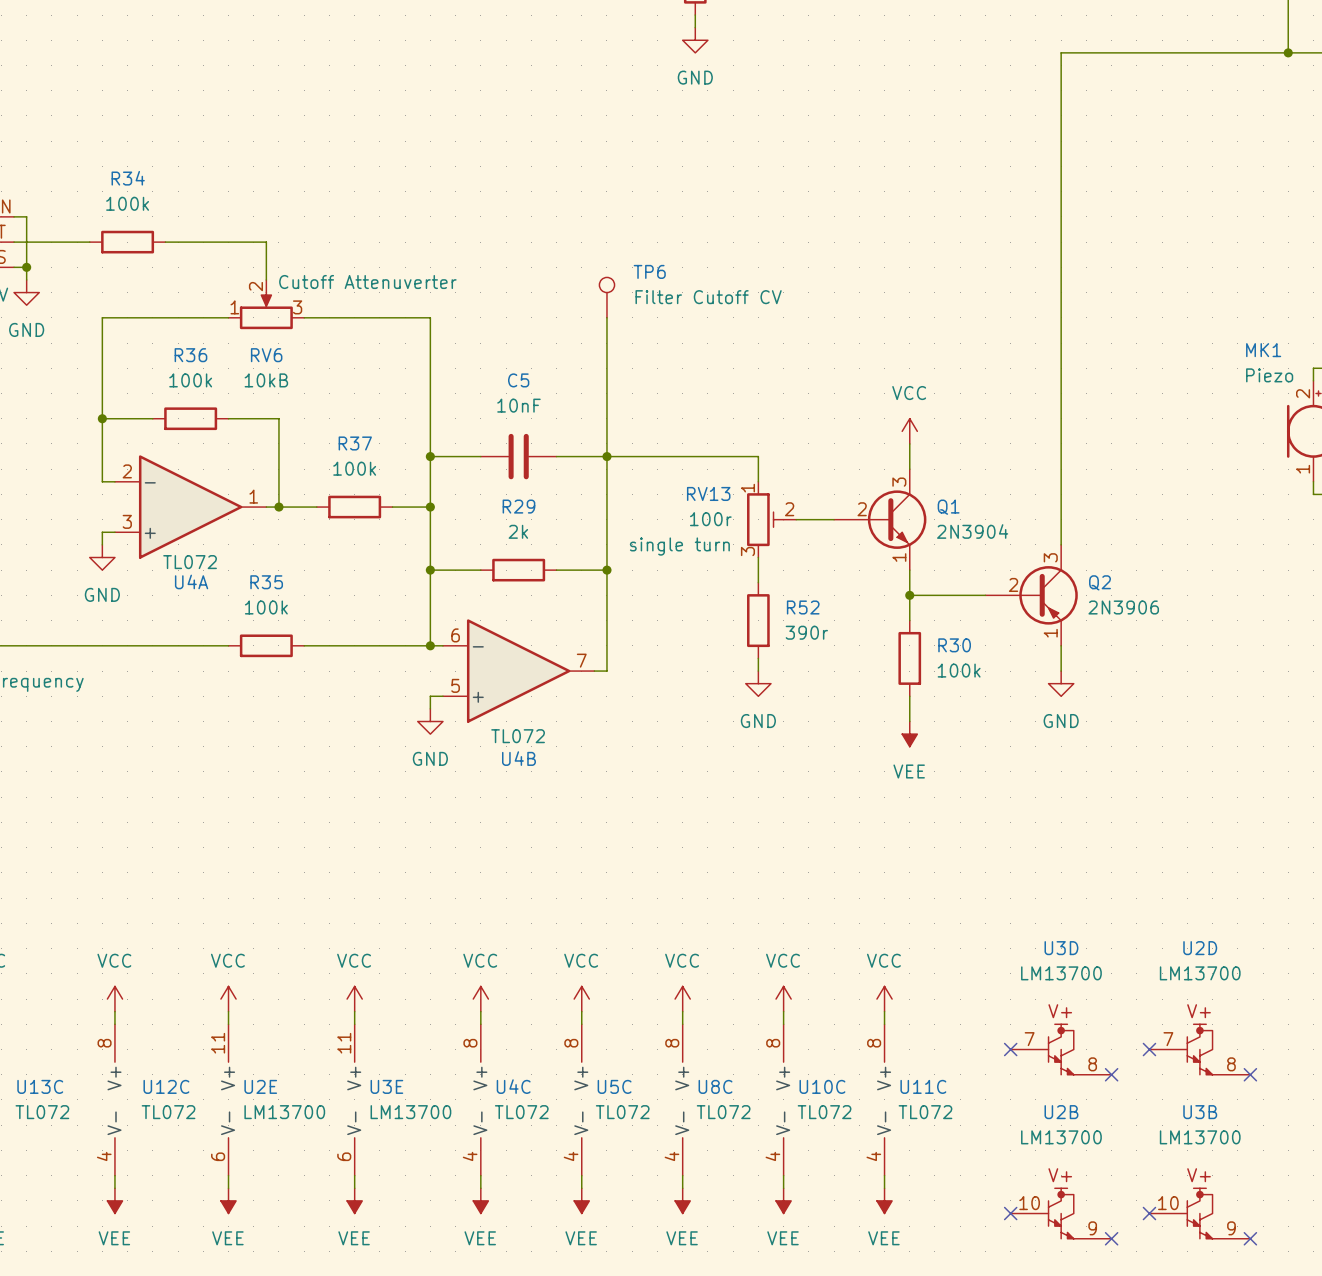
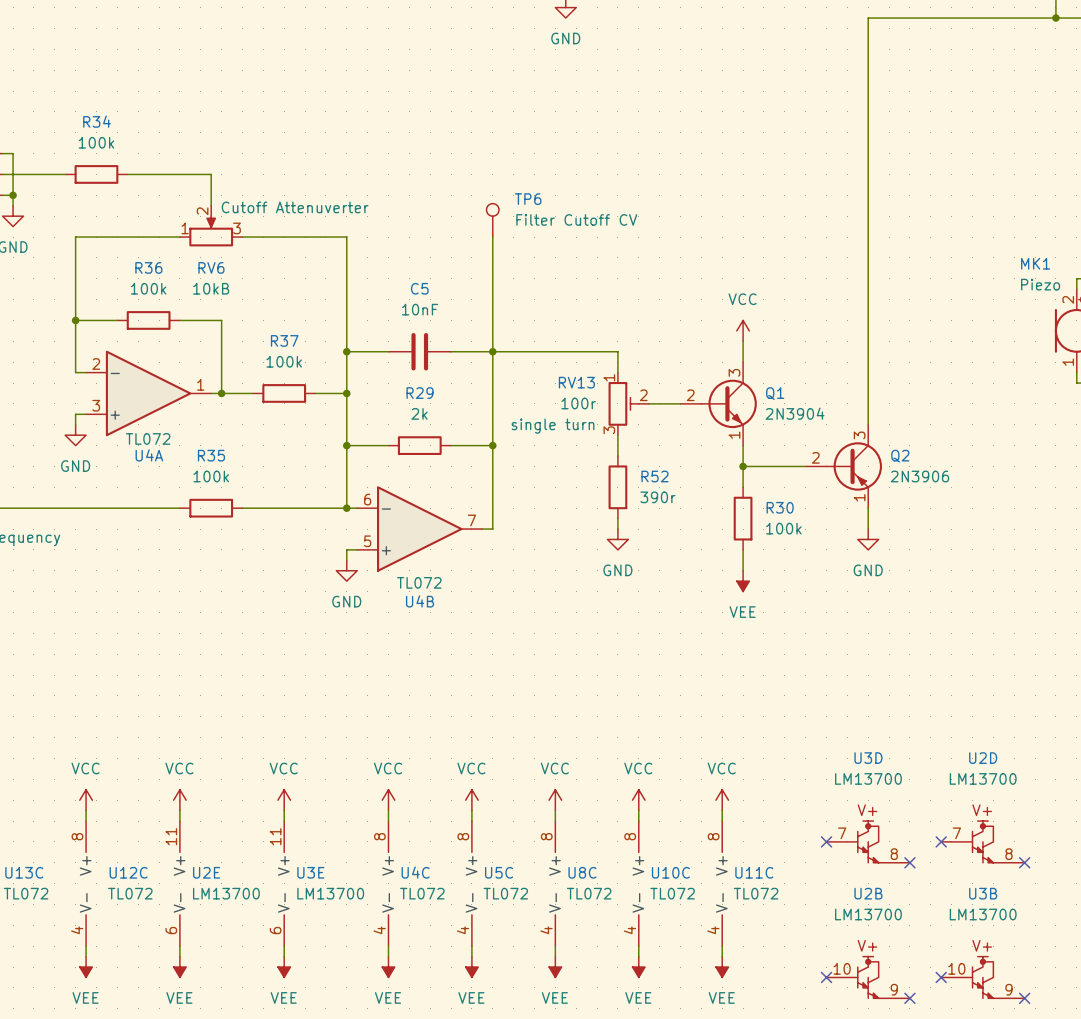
Q1 symbol: [834, 469, 927, 571] -> [680, 362, 757, 446]
Q2 symbol: [985, 544, 1078, 646] -> [805, 424, 882, 509]

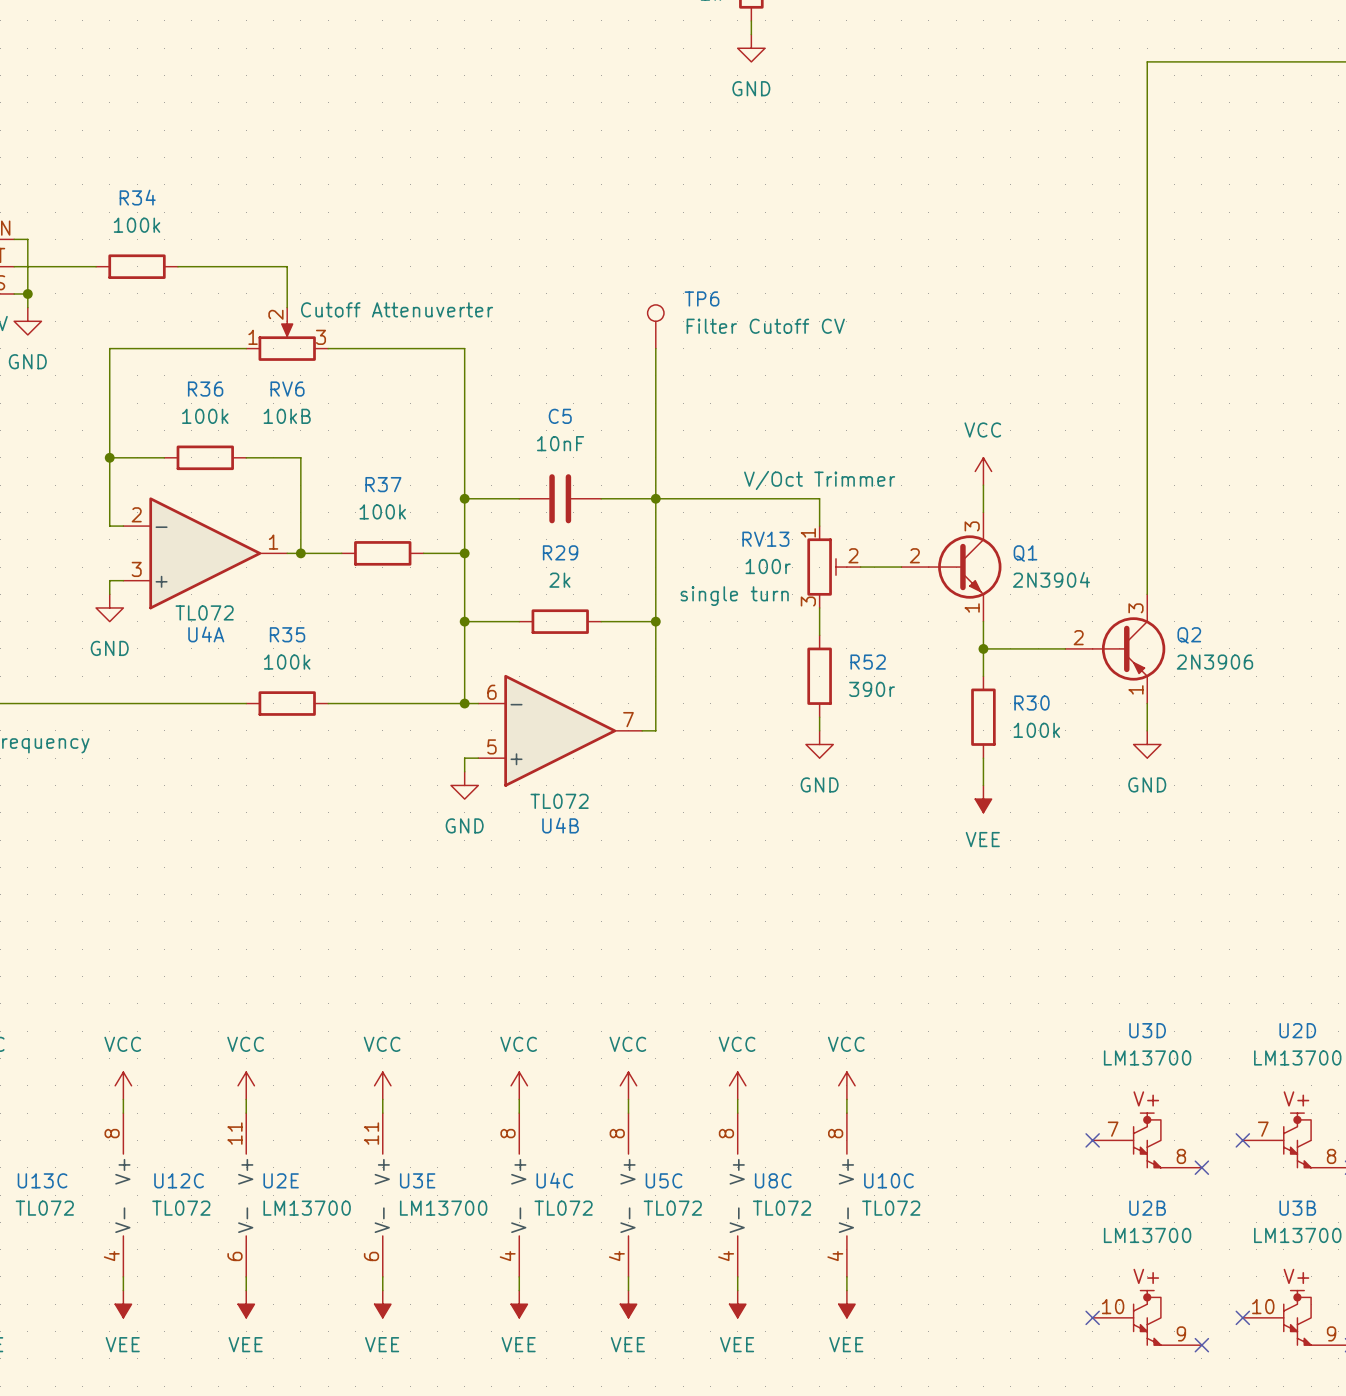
RV13 text: none -> V/Oct Trimmer (819, 480)
power symbol: VCC (722, 800) -> none
wire: (722, 810) (722, 821) -> none
U11C: TL072 (722, 883) -> none
wire: (722, 946) (722, 956) -> none
power symbol: VEE (722, 967) -> none

